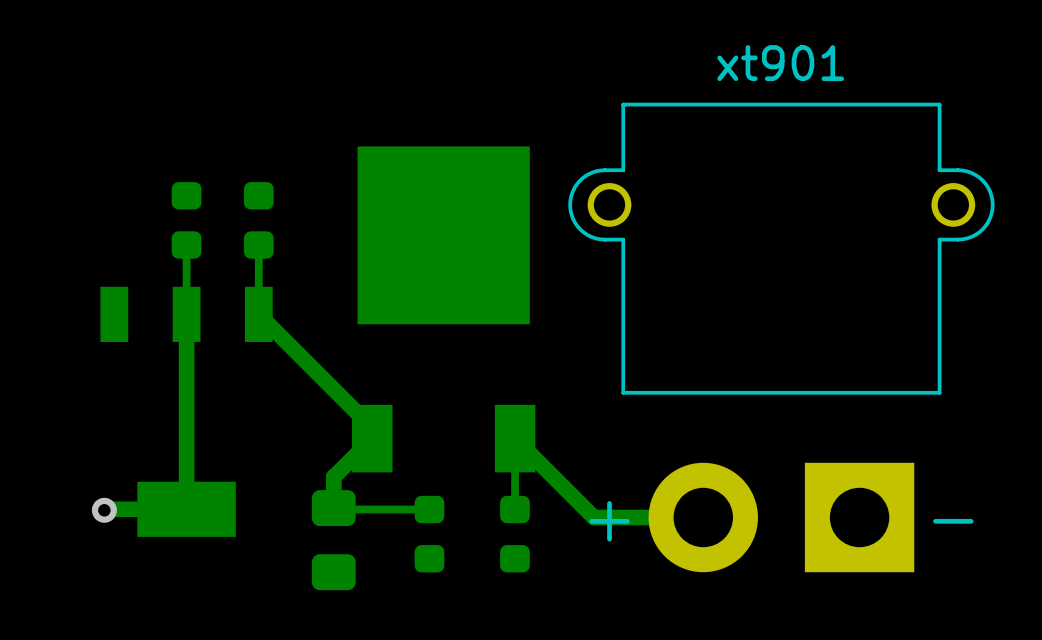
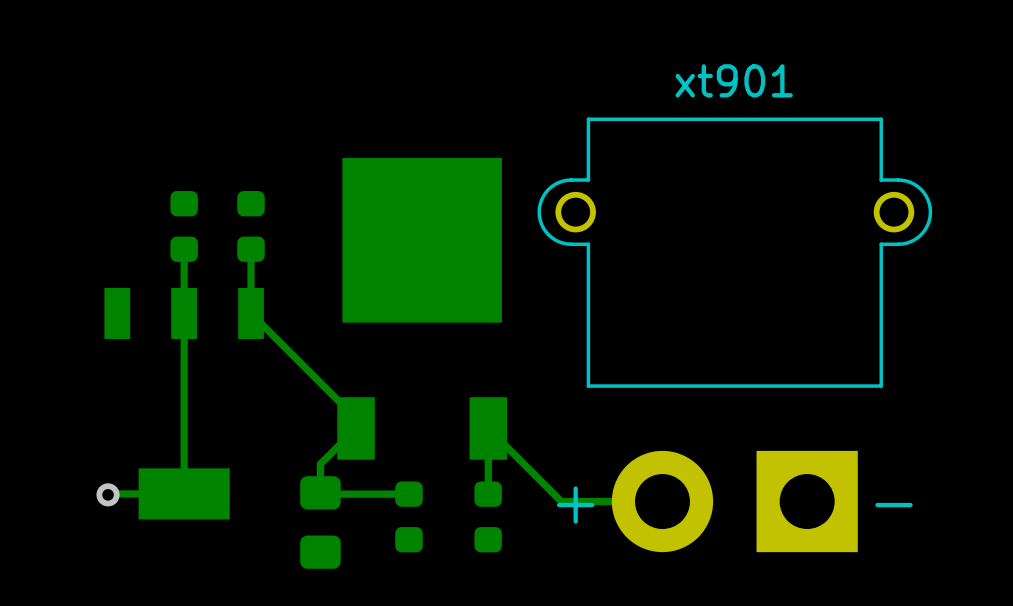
bottom track width: thick (186, 314) (186, 509) (105, 509) -> thin (184, 313) (184, 493) (108, 493)
bottom track width: thick (258, 314) (372, 427) (372, 438) (333, 477) (333, 508) -> thin (251, 313) (356, 418) (356, 428) (320, 464) (320, 492)
bottom track width: thick (515, 438) (593, 517) (703, 517) -> thin (488, 428) (561, 501) (662, 501)

